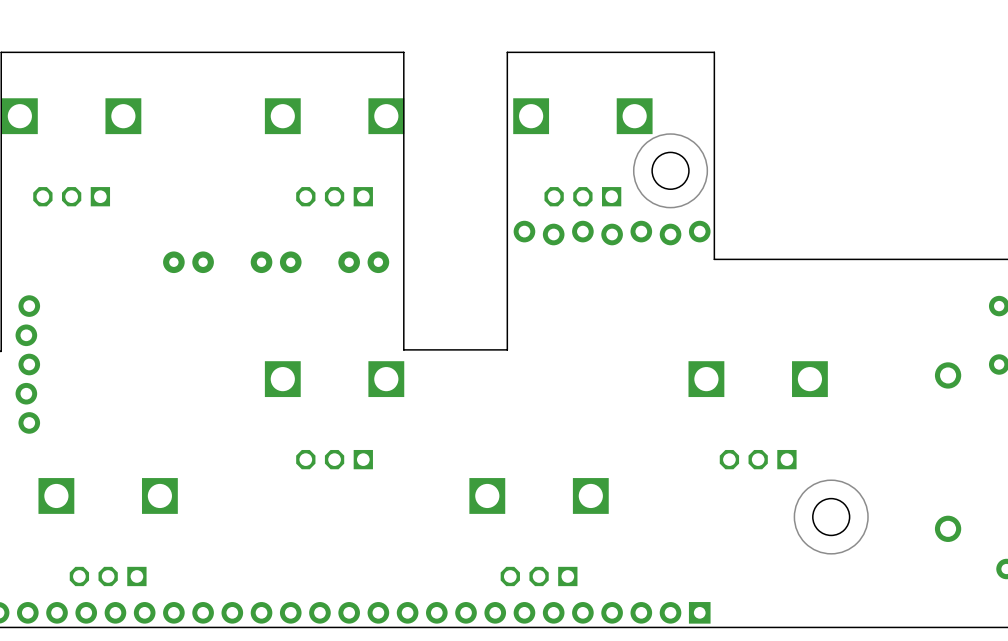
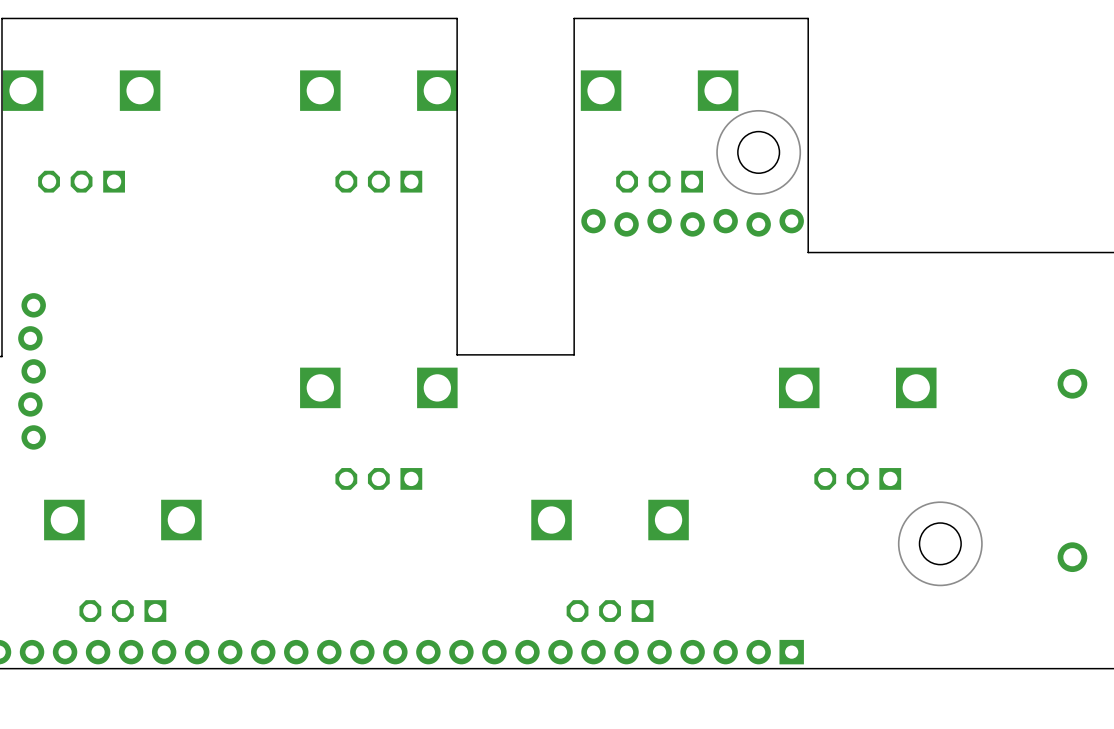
part: (188, 262) -> none
part: (276, 262) -> none
part: (363, 262) -> none

